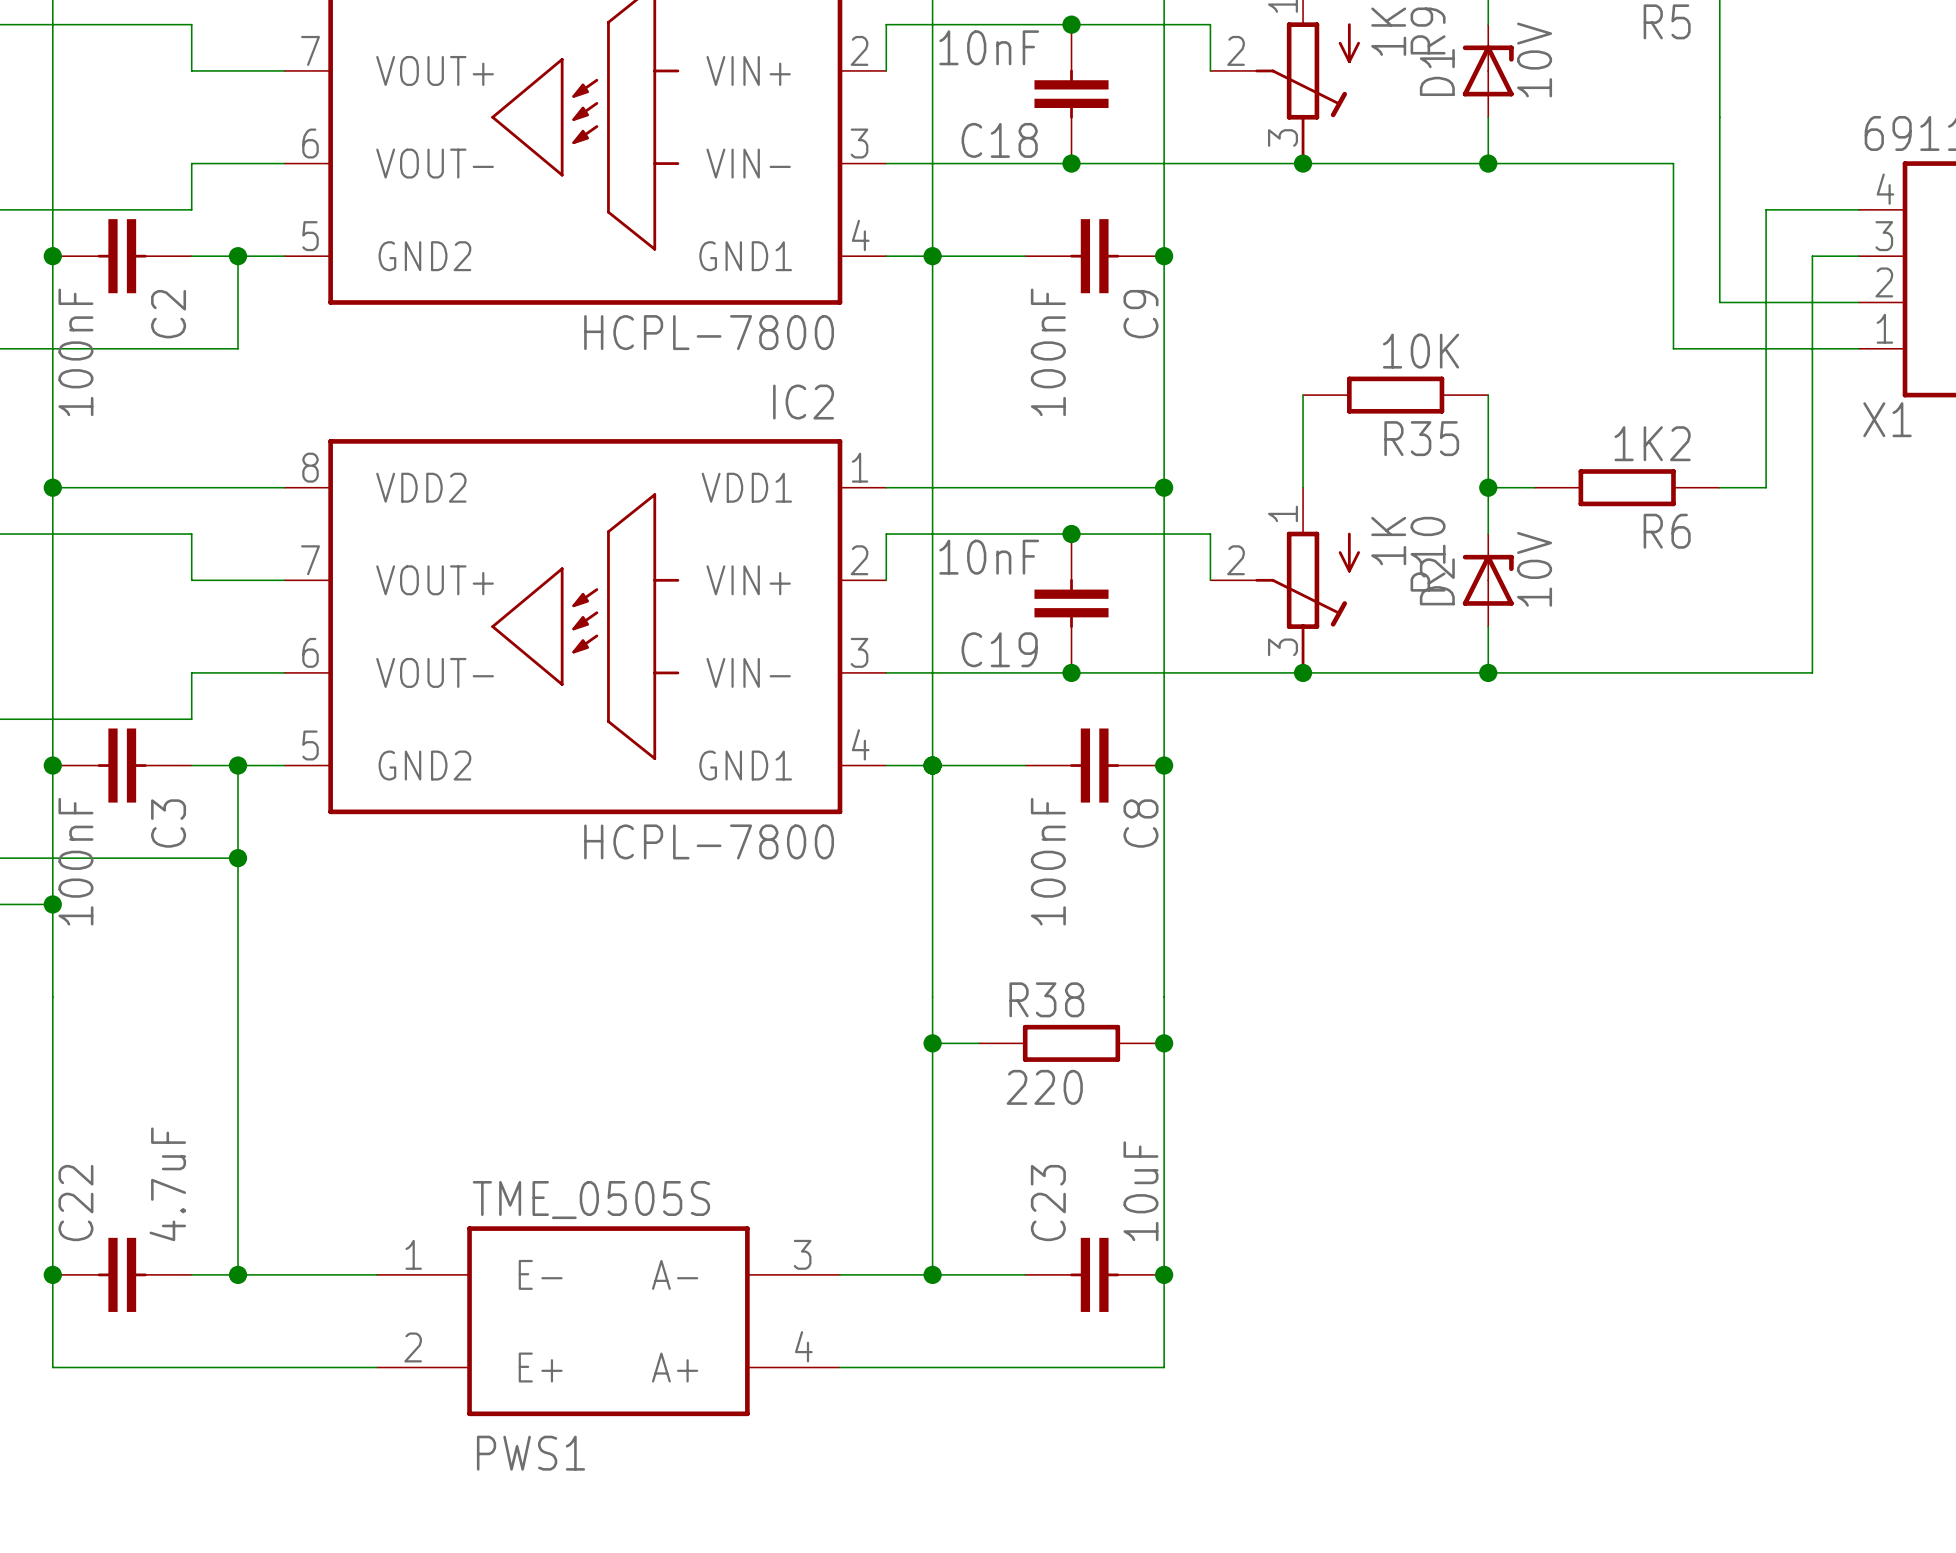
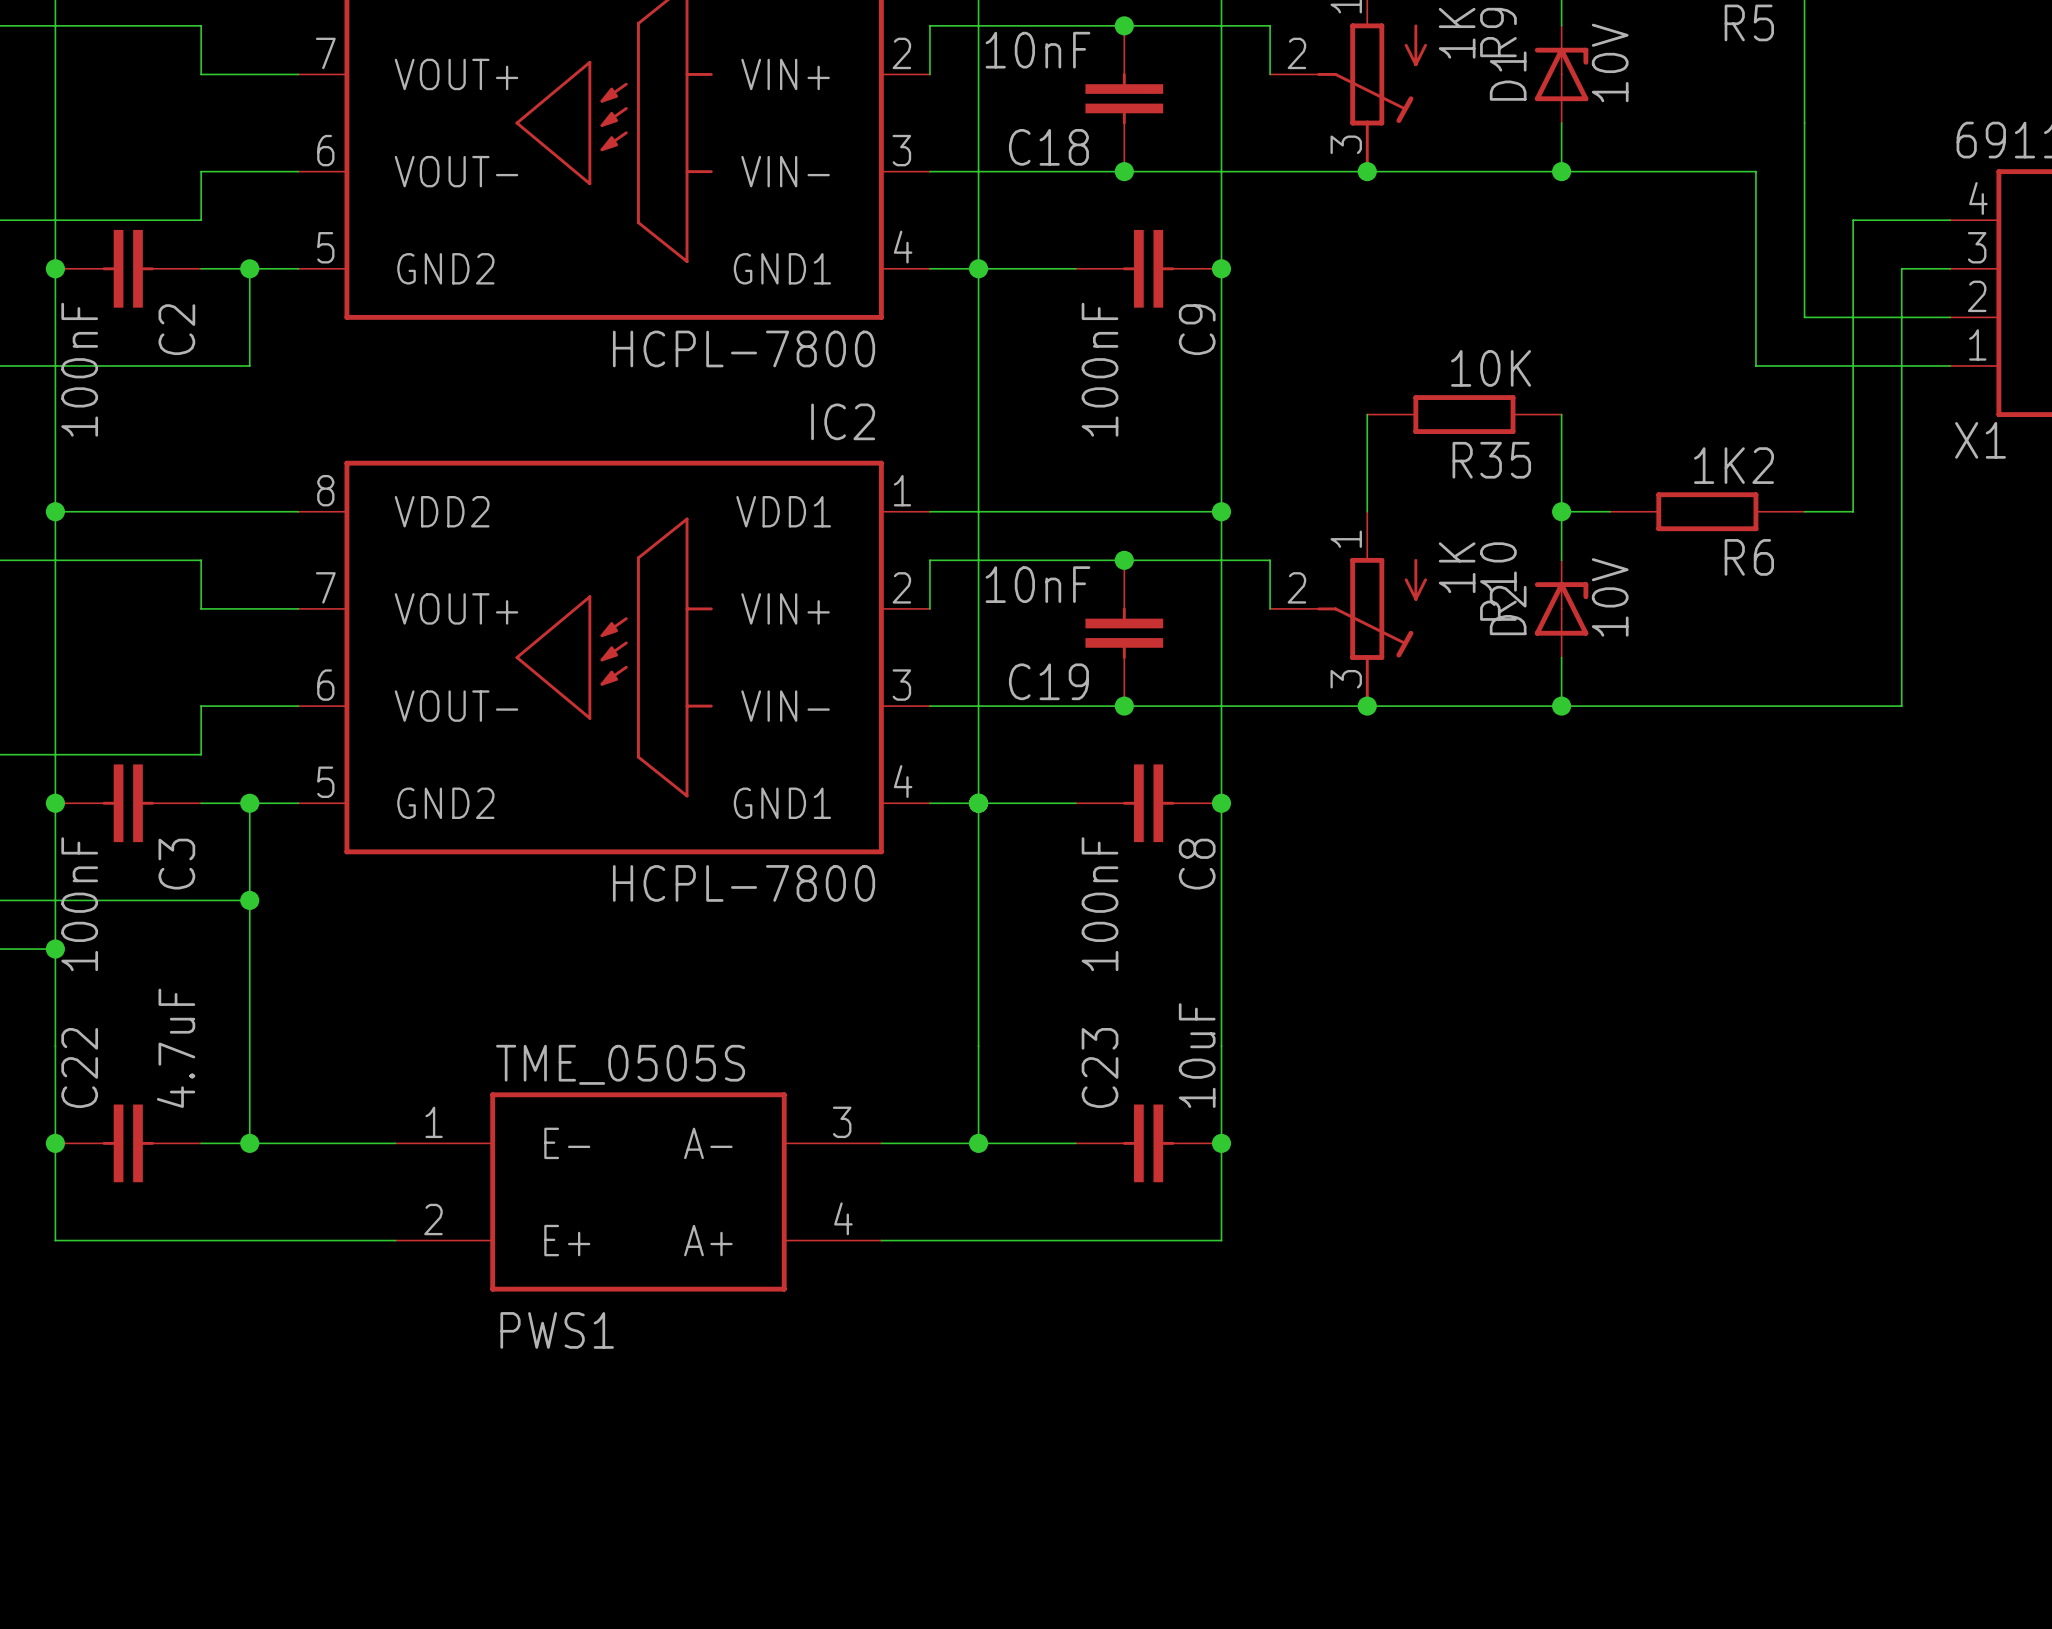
wire: (932, 1043) (978, 1043) -> none
junction position: (932, 1043) -> (978, 1143)
R38: 220 (1071, 1043) -> none
junction position: (1164, 1043) -> (1221, 1143)
junction: none -> (55, 1143)
wire: (238, 1089) (238, 1274) -> none
junction: none -> (249, 1143)
wire: (932, 1089) (932, 1274) -> none
wire: (52, 1182) (52, 1367) (376, 1367) -> (55, 1240) (395, 1240)
wire: (1164, 1182) (1164, 1367) (839, 1367) -> (1221, 1240) (881, 1240)
junction: (52, 1274) -> none
C22 position: (122, 1274) -> (128, 1143)
wire: (191, 1274) (376, 1274) -> (201, 1143) (395, 1143)
junction: (238, 1274) -> none
wire: (839, 1274) (1025, 1274) -> (881, 1143) (1075, 1143)
junction: (932, 1274) -> none
C23 position: (1094, 1274) -> (1148, 1143)
junction: (1164, 1274) -> none
PWS1 position: (608, 1321) -> (638, 1191)

